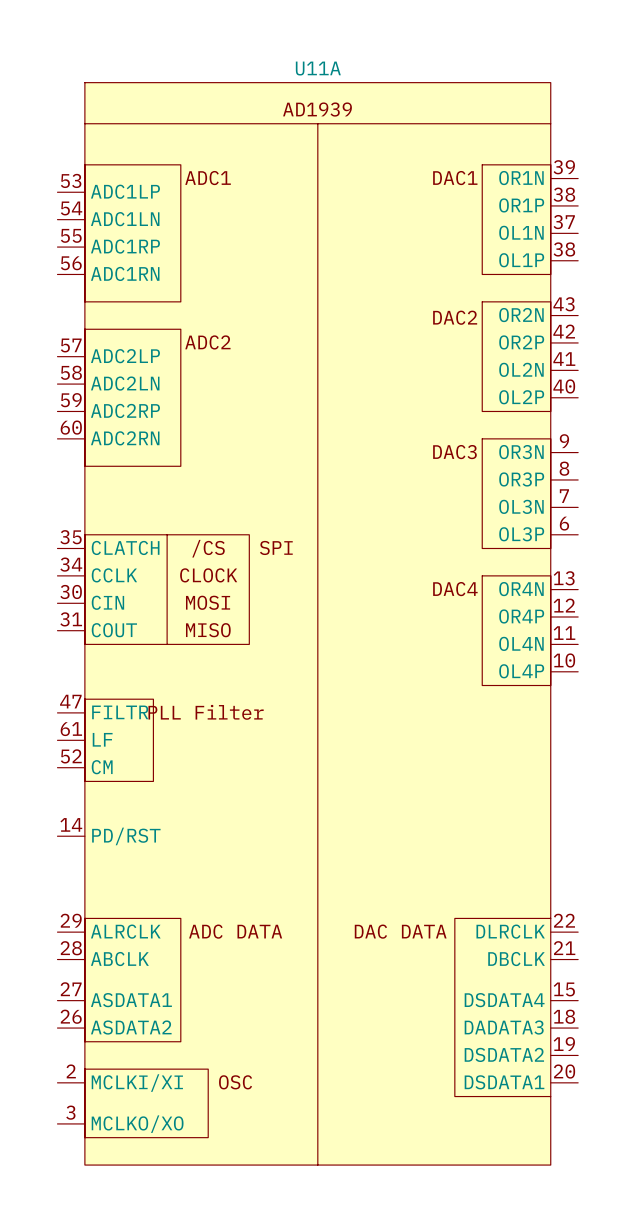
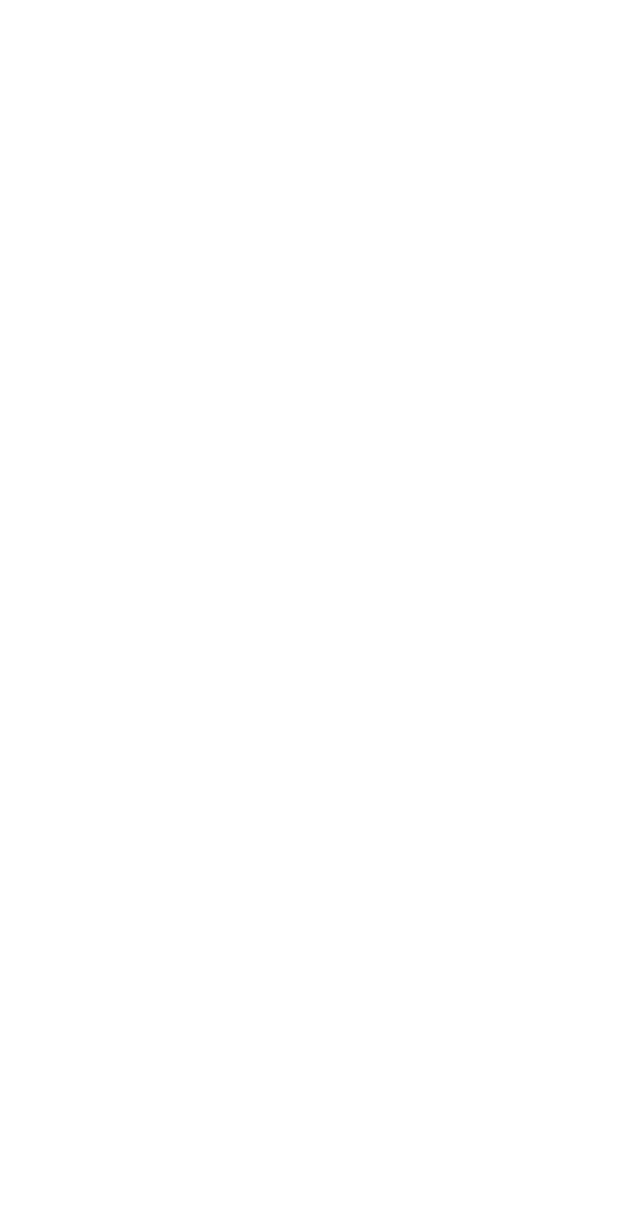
U11A: (317, 623) -> none

